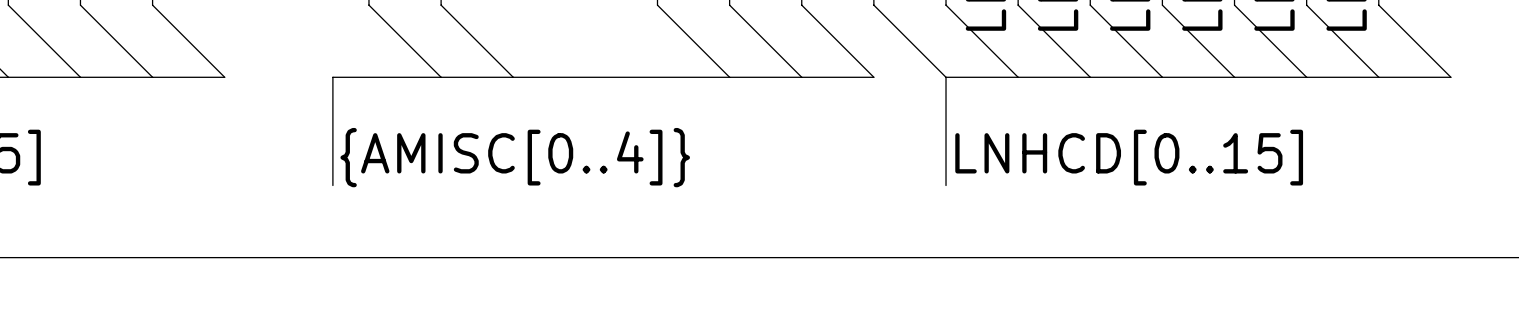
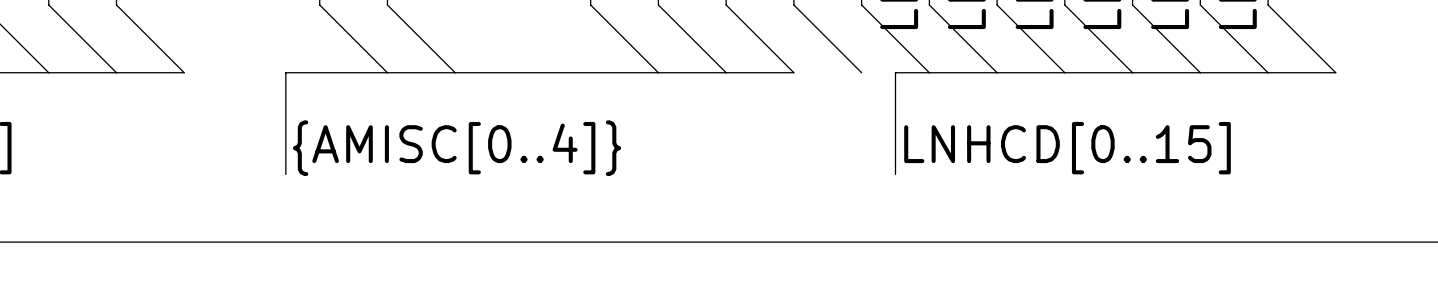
bus: (982, 77) (946, 77) (946, 185) -> (895, 72) (895, 174)
label position: LNHCD[0..15] (1129, 157) -> LNHCD[0..15] (1067, 148)

